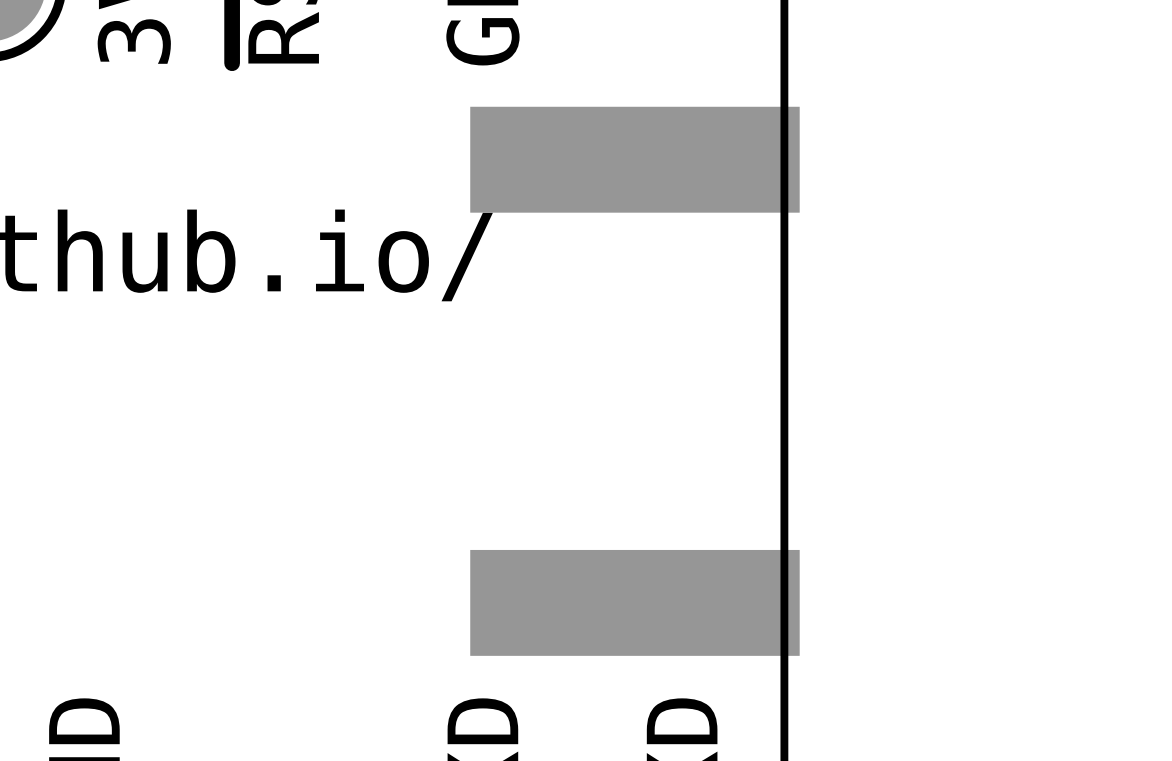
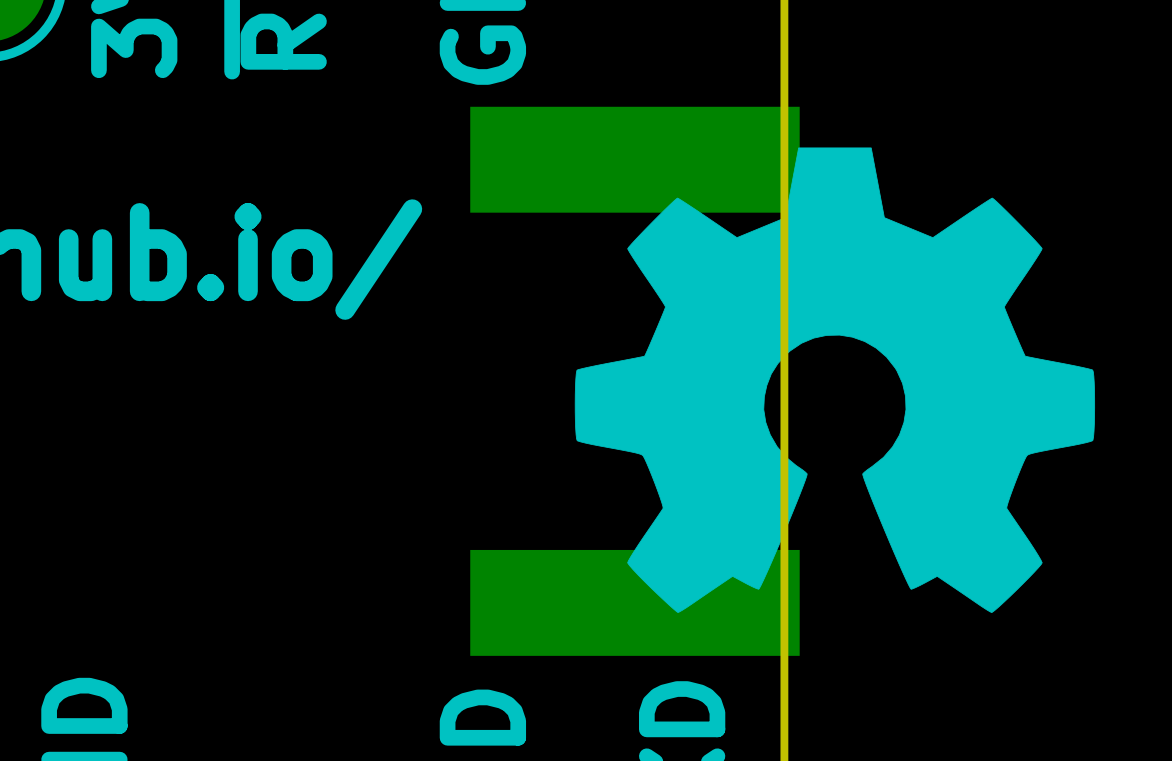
drawing: none -> [574, 147, 1096, 613]

